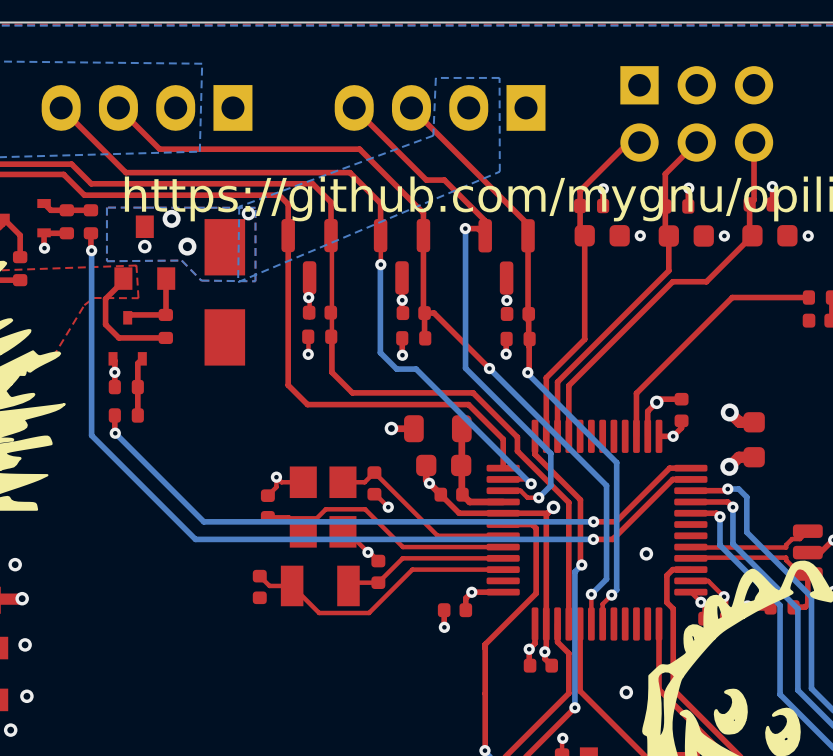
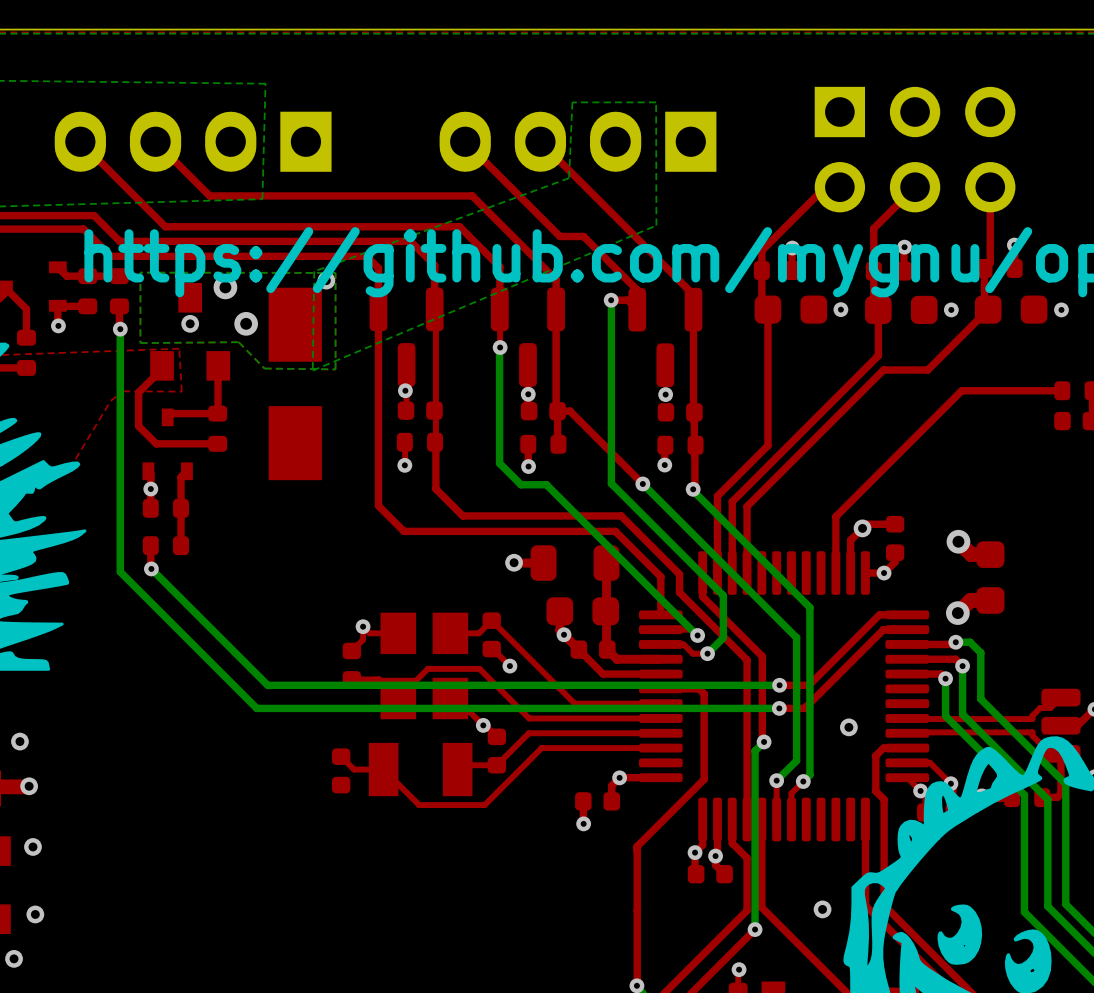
top track: (553, 507) (546, 514) (546, 623) -> none
via: (553, 507) -> none
top track: (547, 513) (503, 513) -> none

